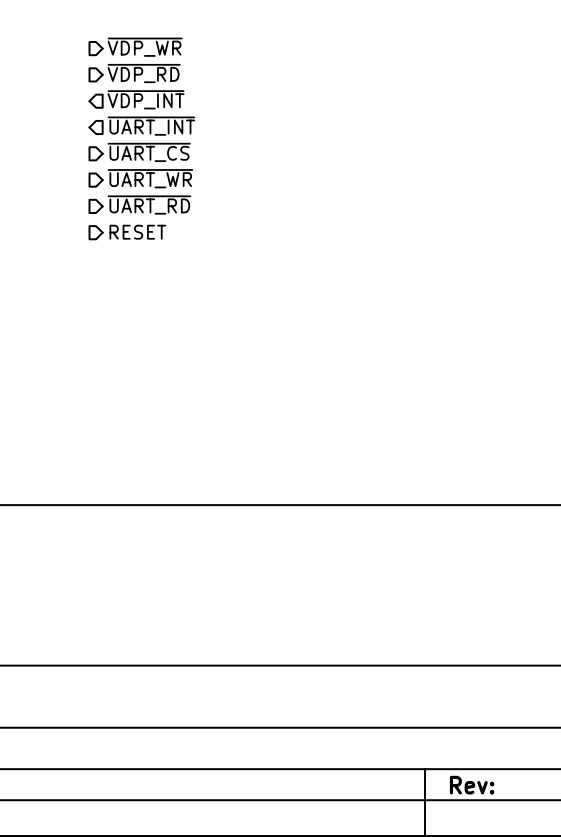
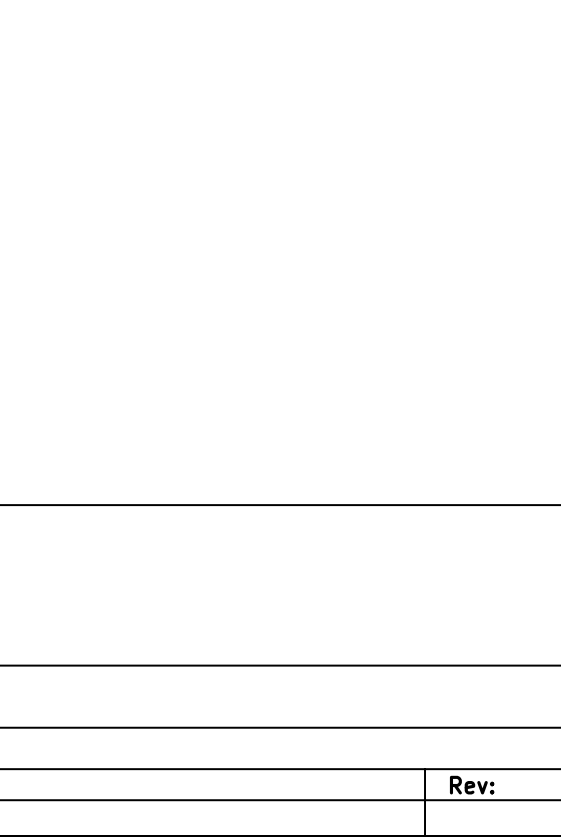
hierarchical label: ~{VDP_WR} (145, 47) -> none
hierarchical label: ~{VDP_RD} (144, 73) -> none
hierarchical label: ~{VDP_INT} (146, 99) -> none
hierarchical label: ~{UART_INT} (151, 126) -> none
hierarchical label: ~{UART_CS} (149, 152) -> none
hierarchical label: ~{UART_WR} (150, 178) -> none
hierarchical label: ~{UART_RD} (149, 205) -> none
hierarchical label: RESET (137, 232) -> none

